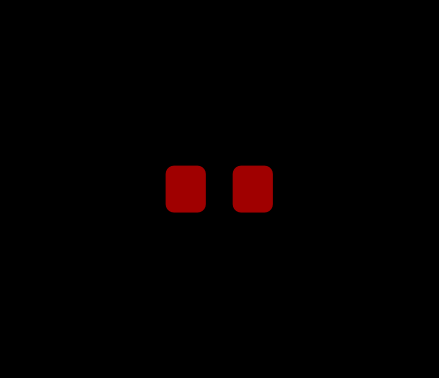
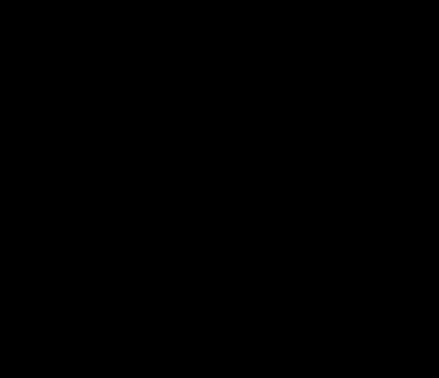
part: (219, 189) -> none

